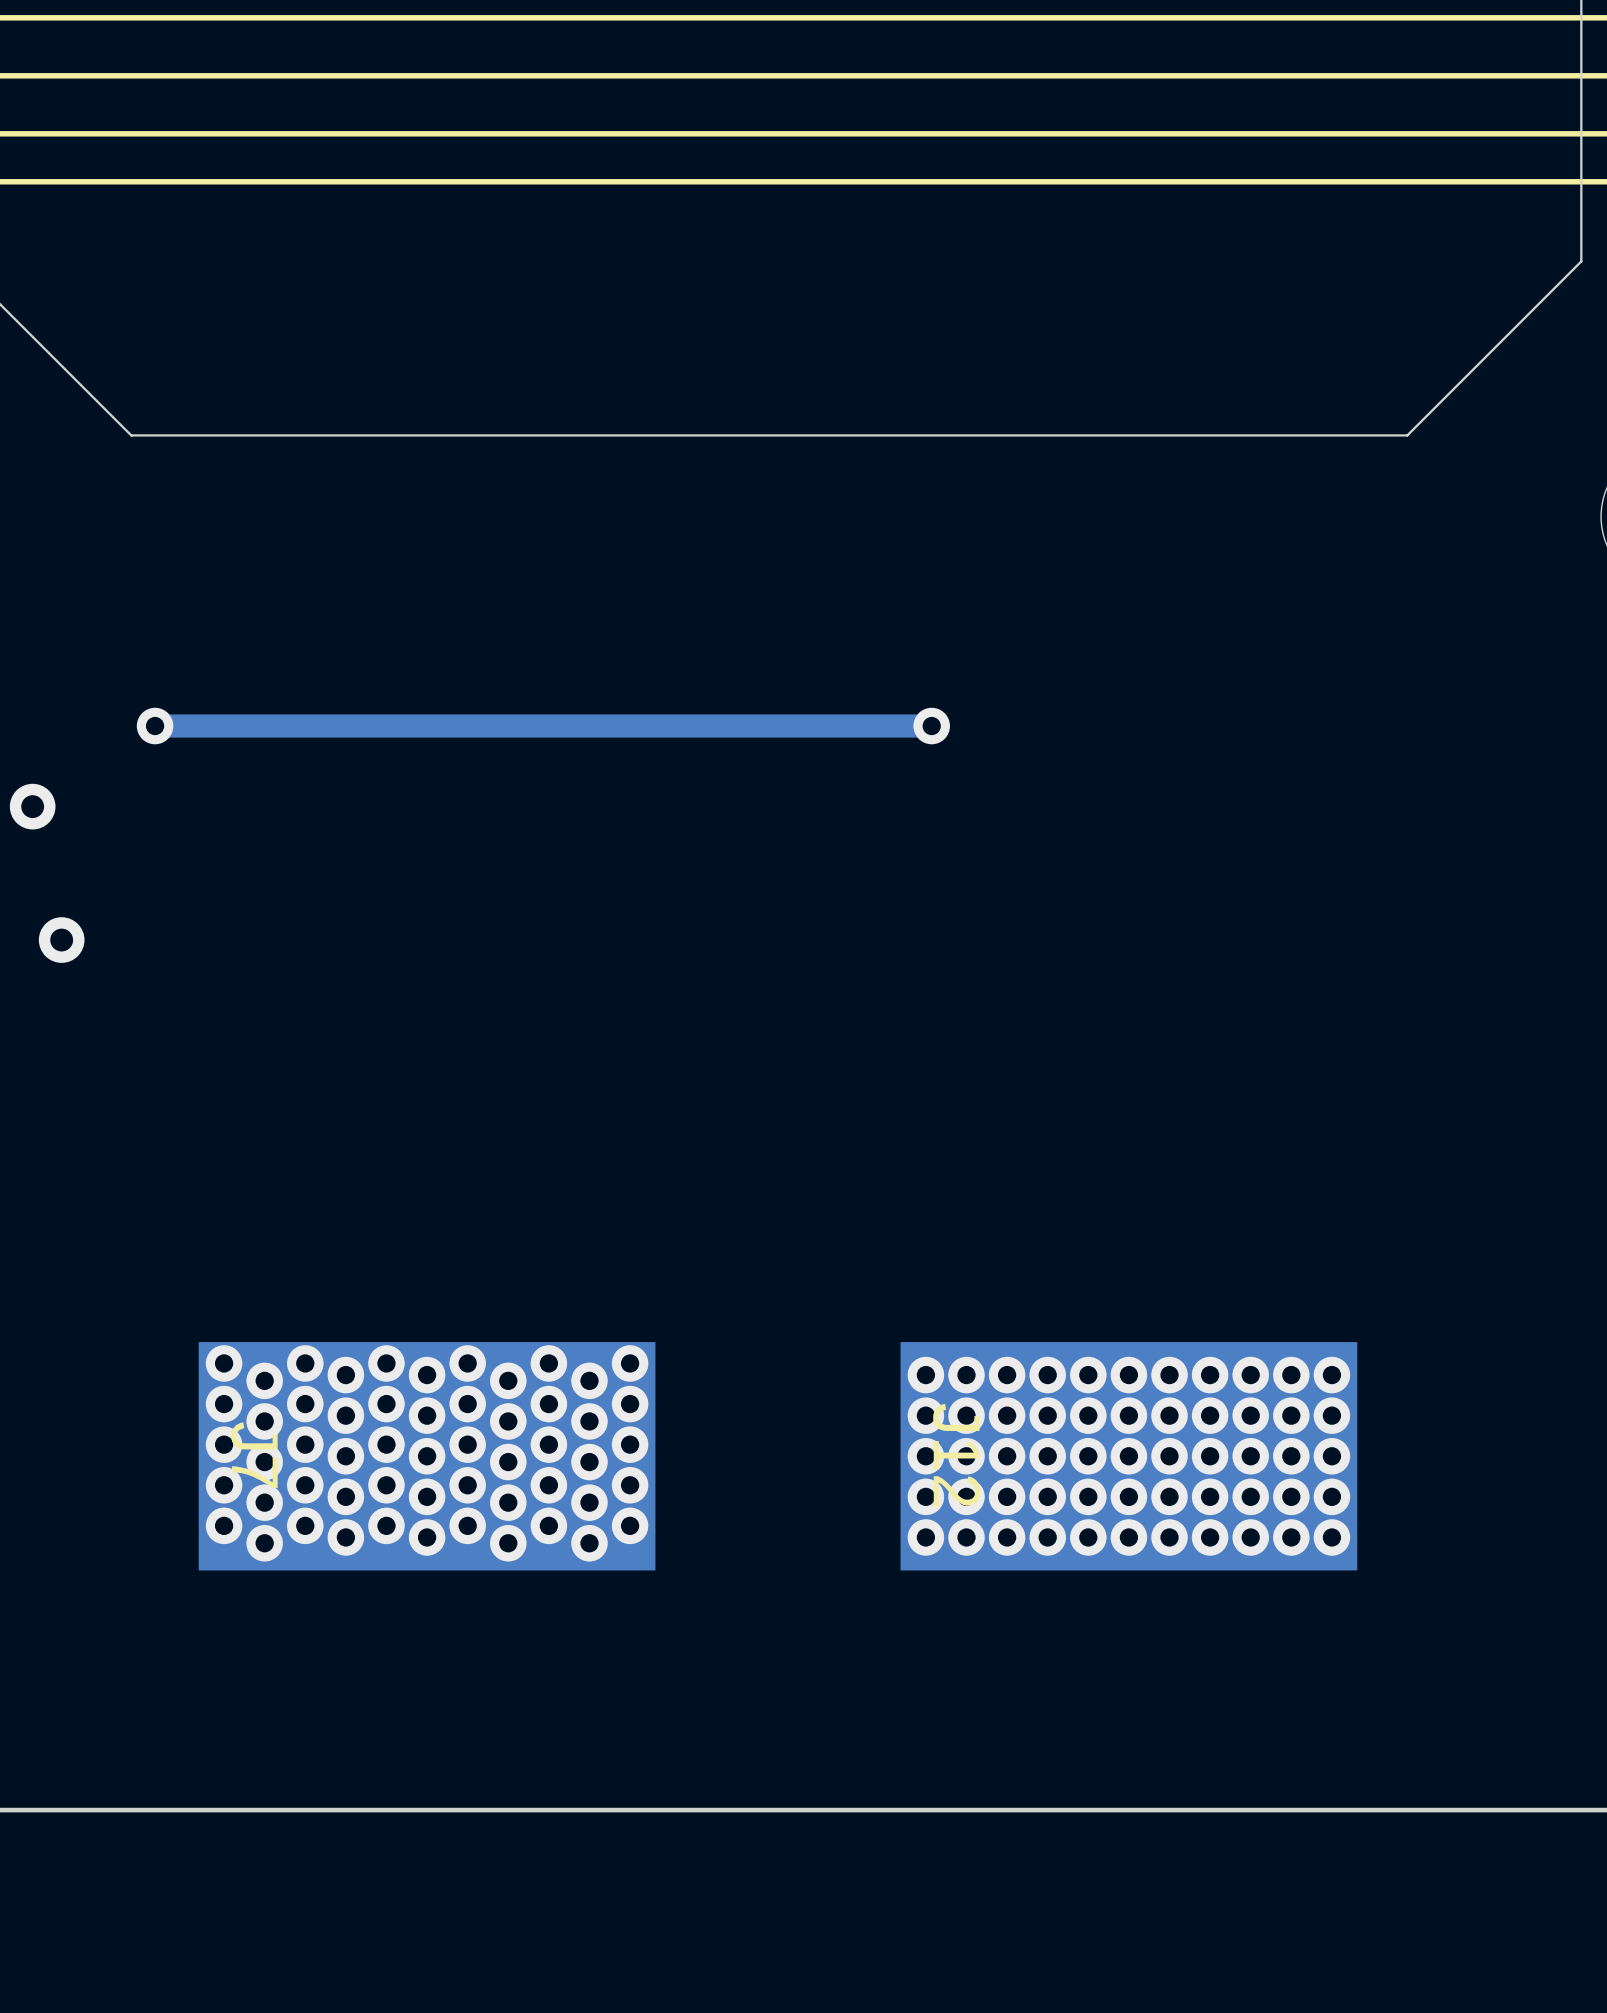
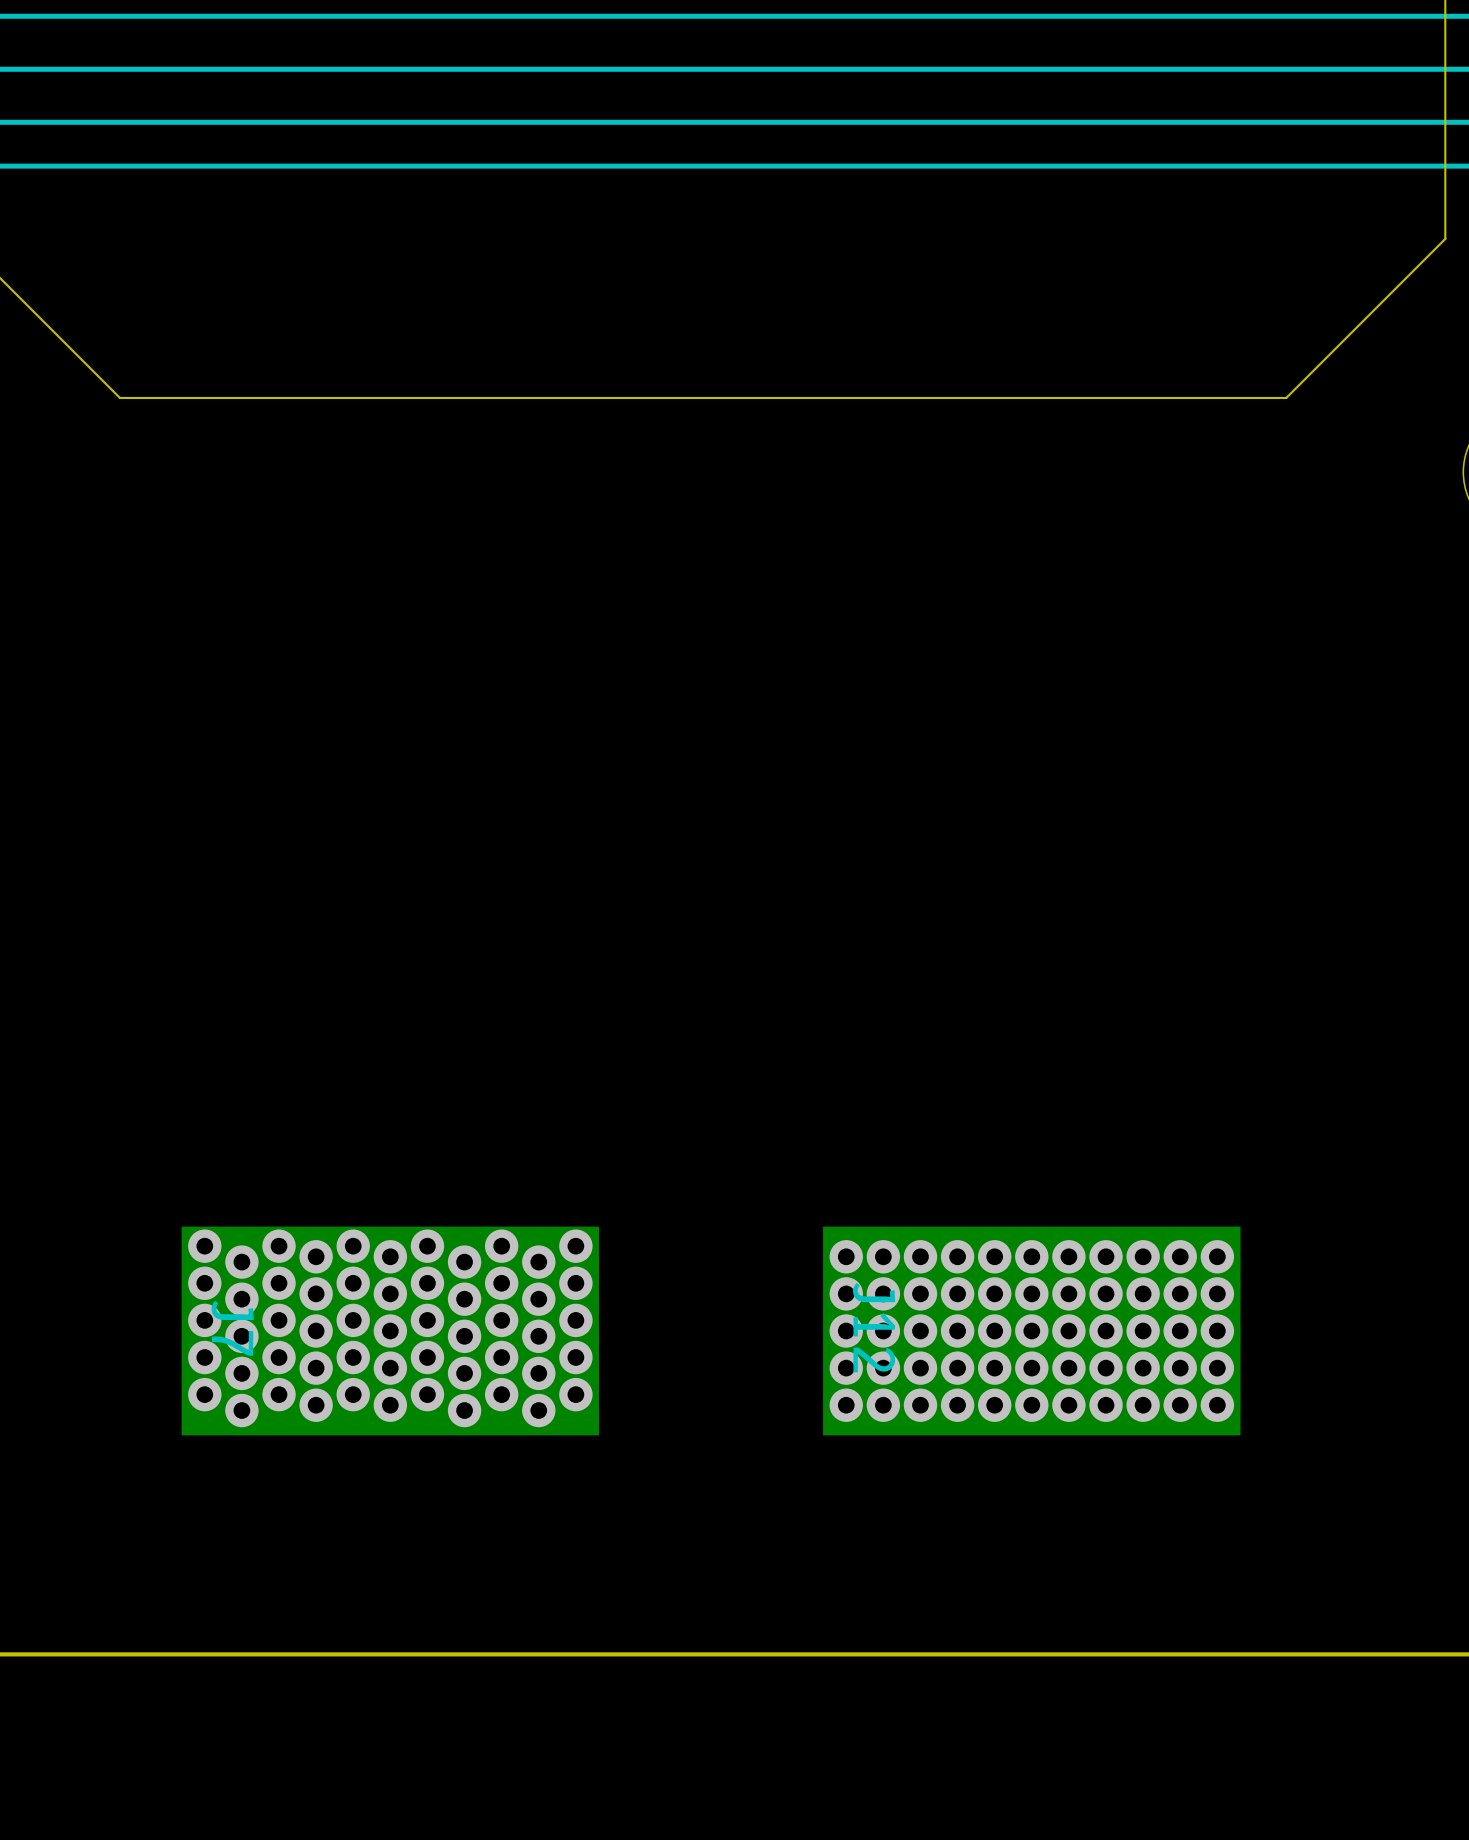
via: (155, 726) -> none
track: (931, 726) (155, 726) -> none
via: (931, 726) -> none
via: (32, 806) -> none
via: (61, 940) -> none

